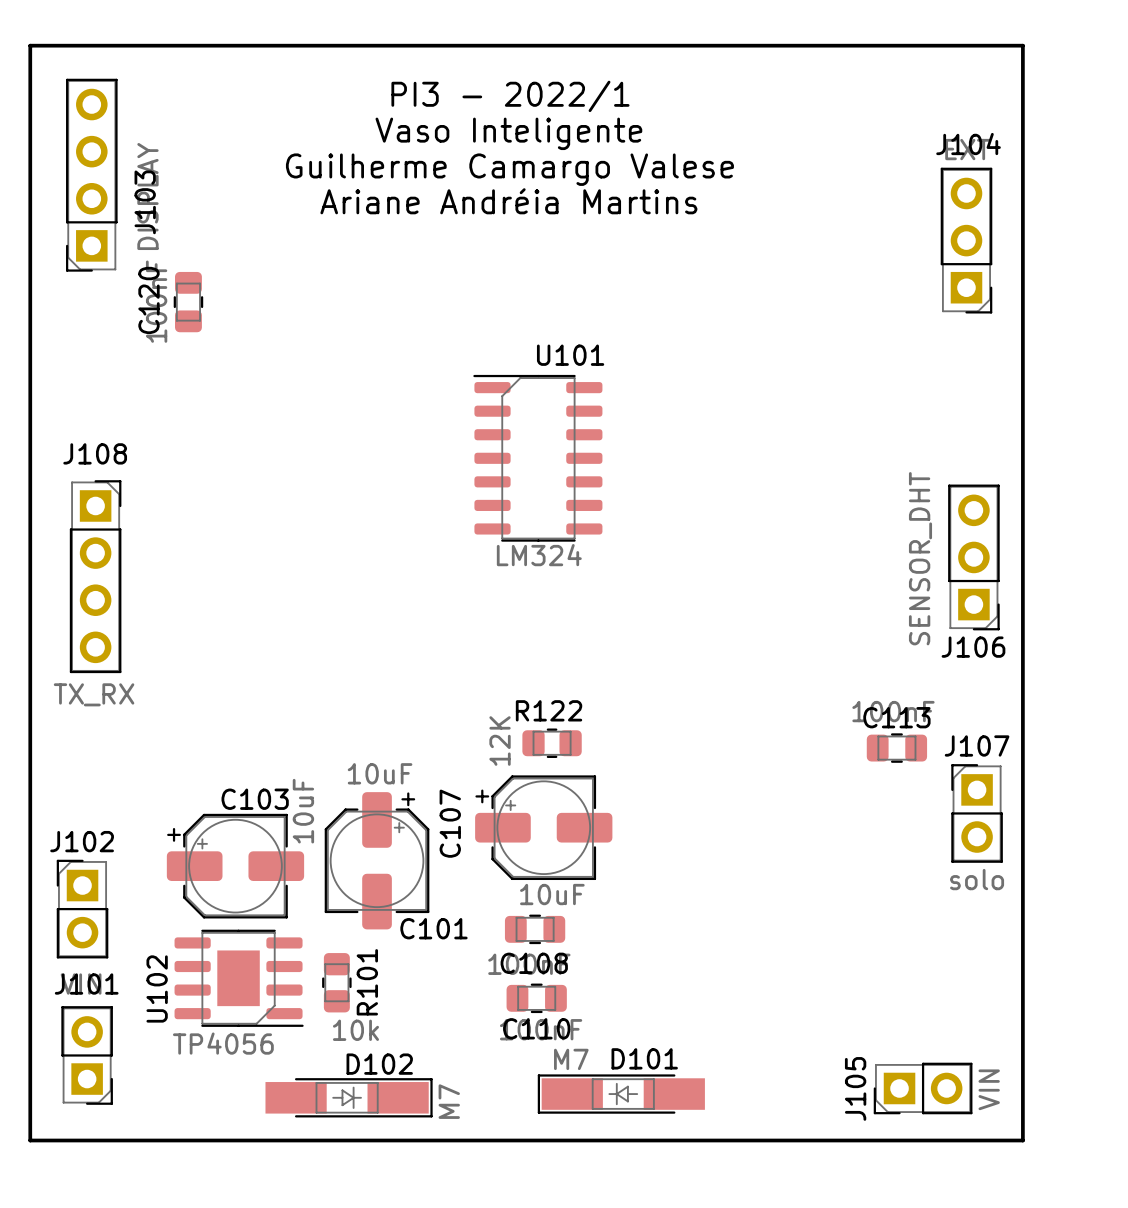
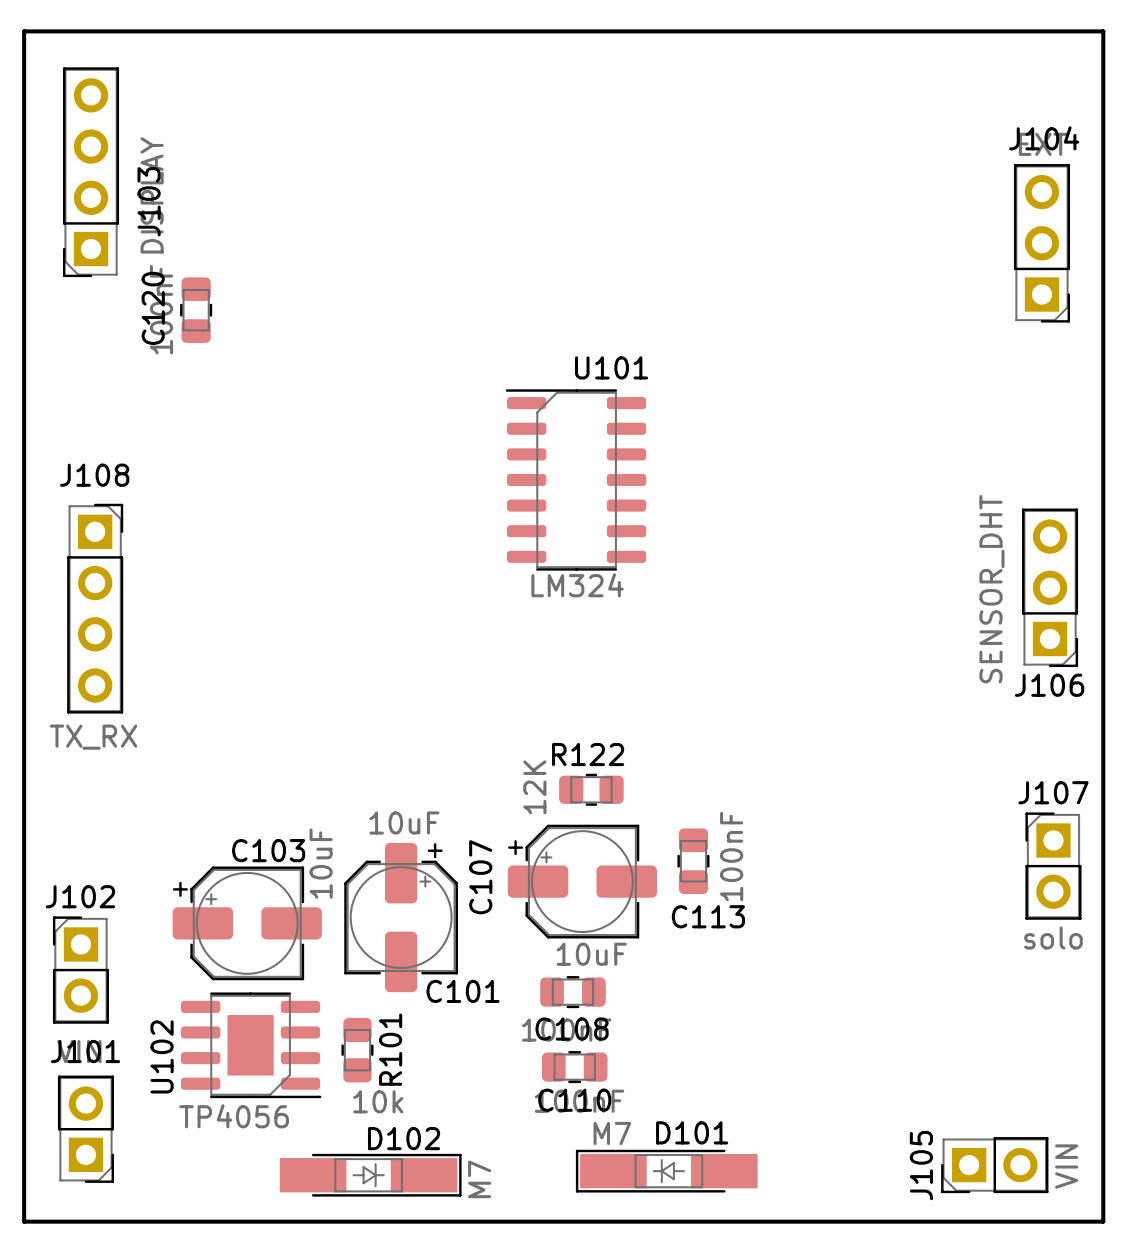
text: PI3 - 2022/1 (510, 96) -> none
text: Vaso Inteligente (508, 133) -> none
text: Guilherme Camargo Valese (509, 169) -> none
text: Ariane Andréia Martins (508, 201) -> none
C113 name position: C113 (896, 717) -> C113 (708, 916)
C113 rotation: 0° (896, 748) -> 90° clockwise (693, 861)
C113 position: (896, 748) -> (693, 861)

